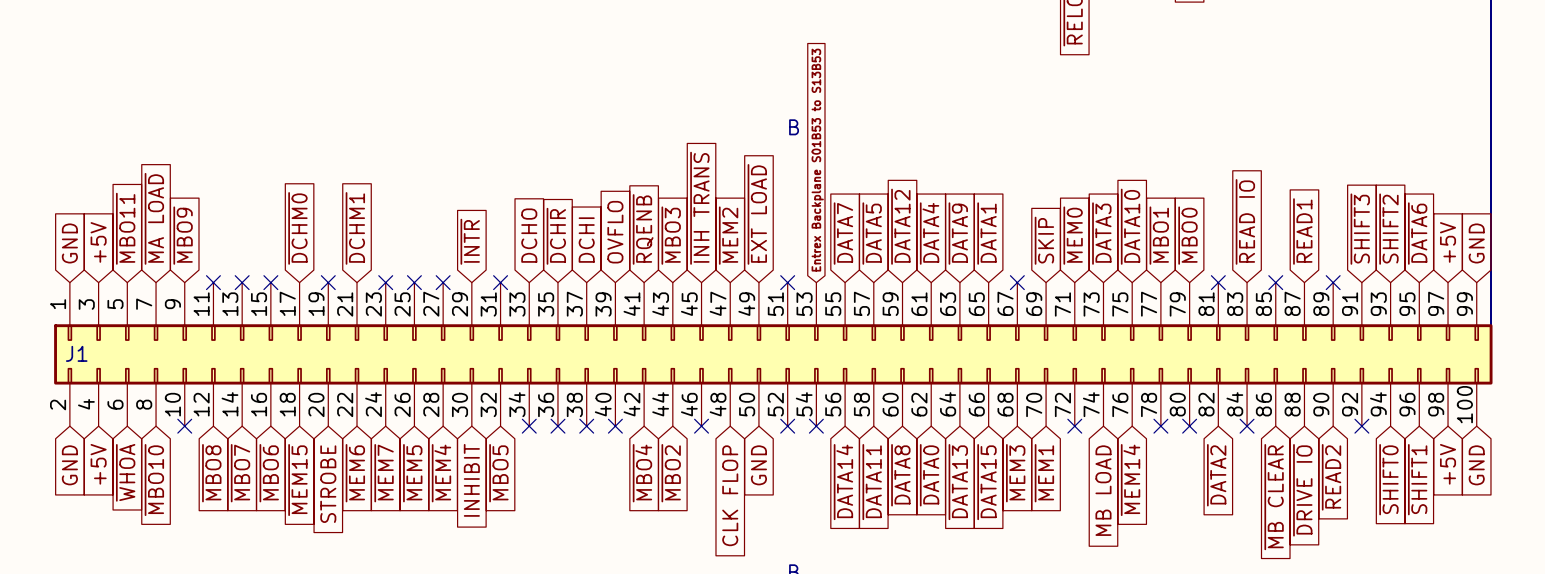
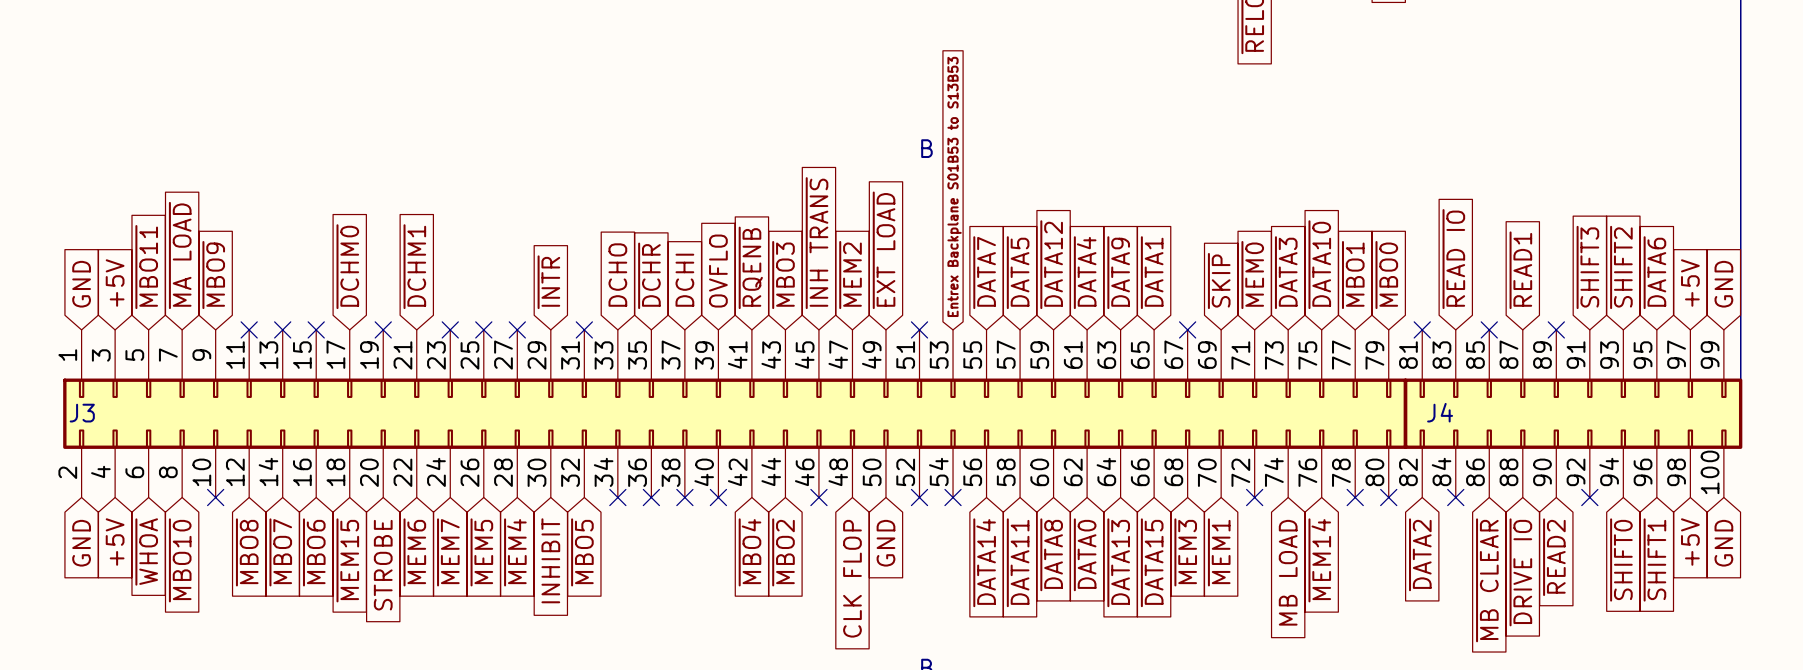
J3: none -> (735, 413)
J1: (773, 354) -> none
J4: none -> (1573, 413)

